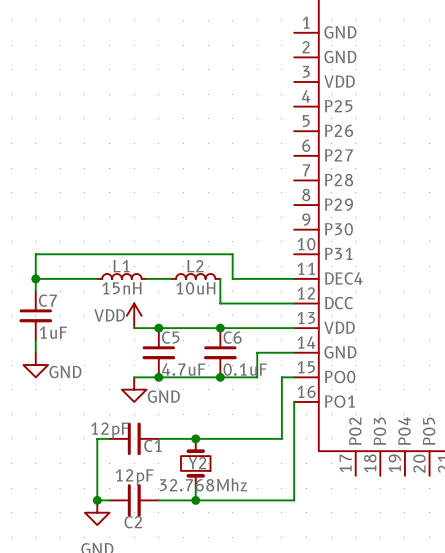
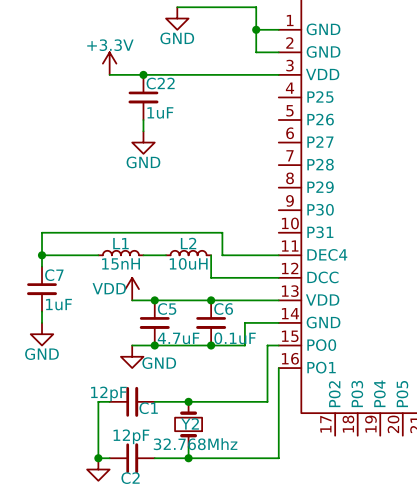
wire: none -> (177, 7) (256, 7) (256, 52) (278, 52)
power symbol: none -> GND (177, 18)
wire: none -> (256, 29) (278, 29)
junction: none -> (256, 29)
power symbol: none -> +3.3V (109, 63)
wire: none -> (109, 74) (278, 74)
junction: none -> (143, 74)
C22: none -> 1uF (143, 97)
wire: none -> (143, 120) (143, 131)
power symbol: none -> GND (143, 142)
power symbol text position: GND (65, 372) -> GND (41, 354)

